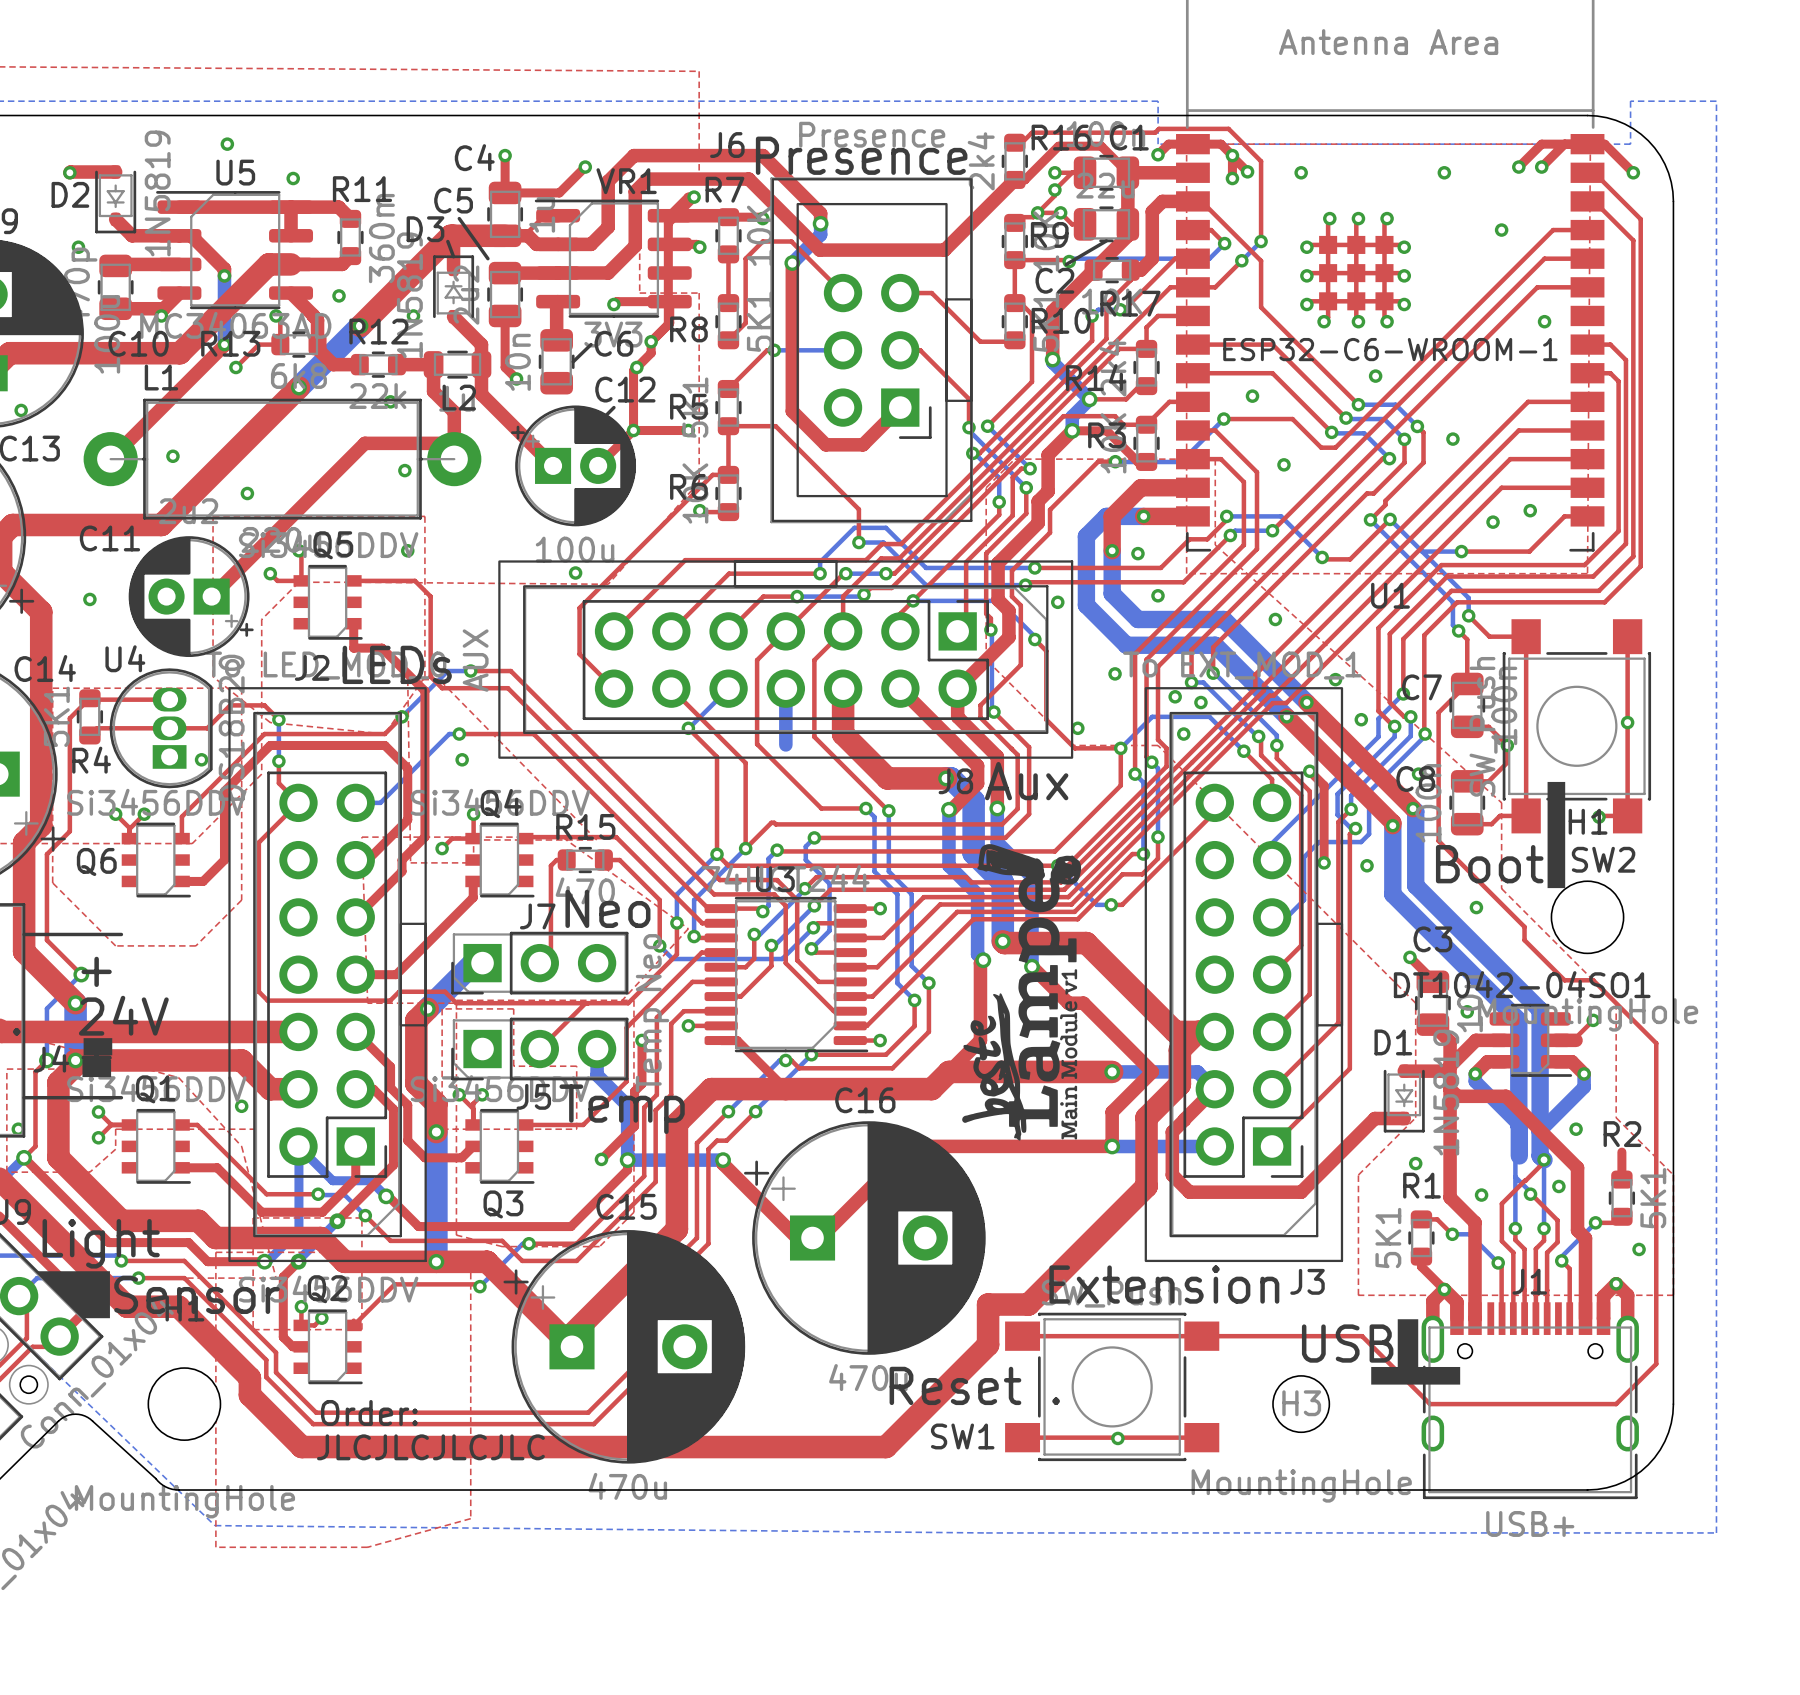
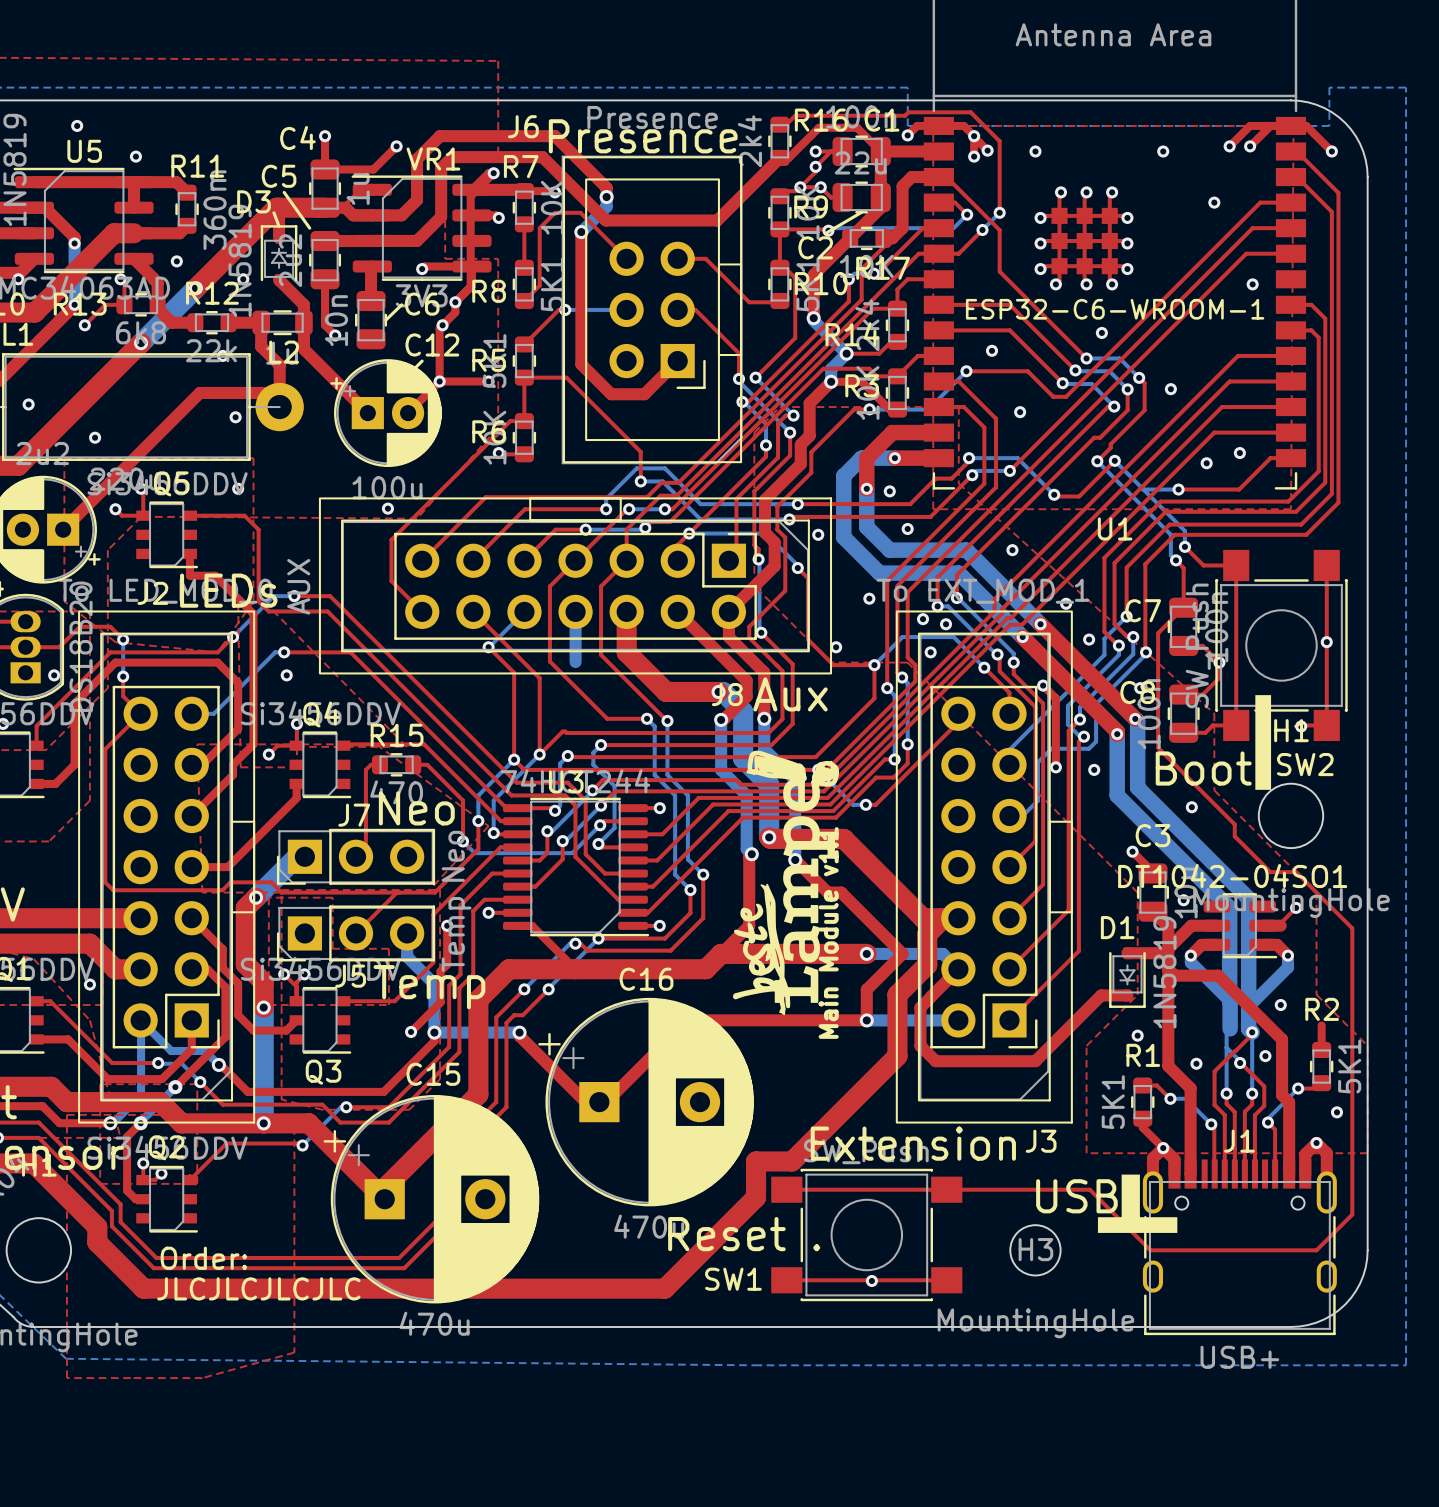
drawing shape: [962, 844, 1082, 1141] -> [732, 750, 840, 1016]
text: none -> Main Module v1.1 (828, 932)

